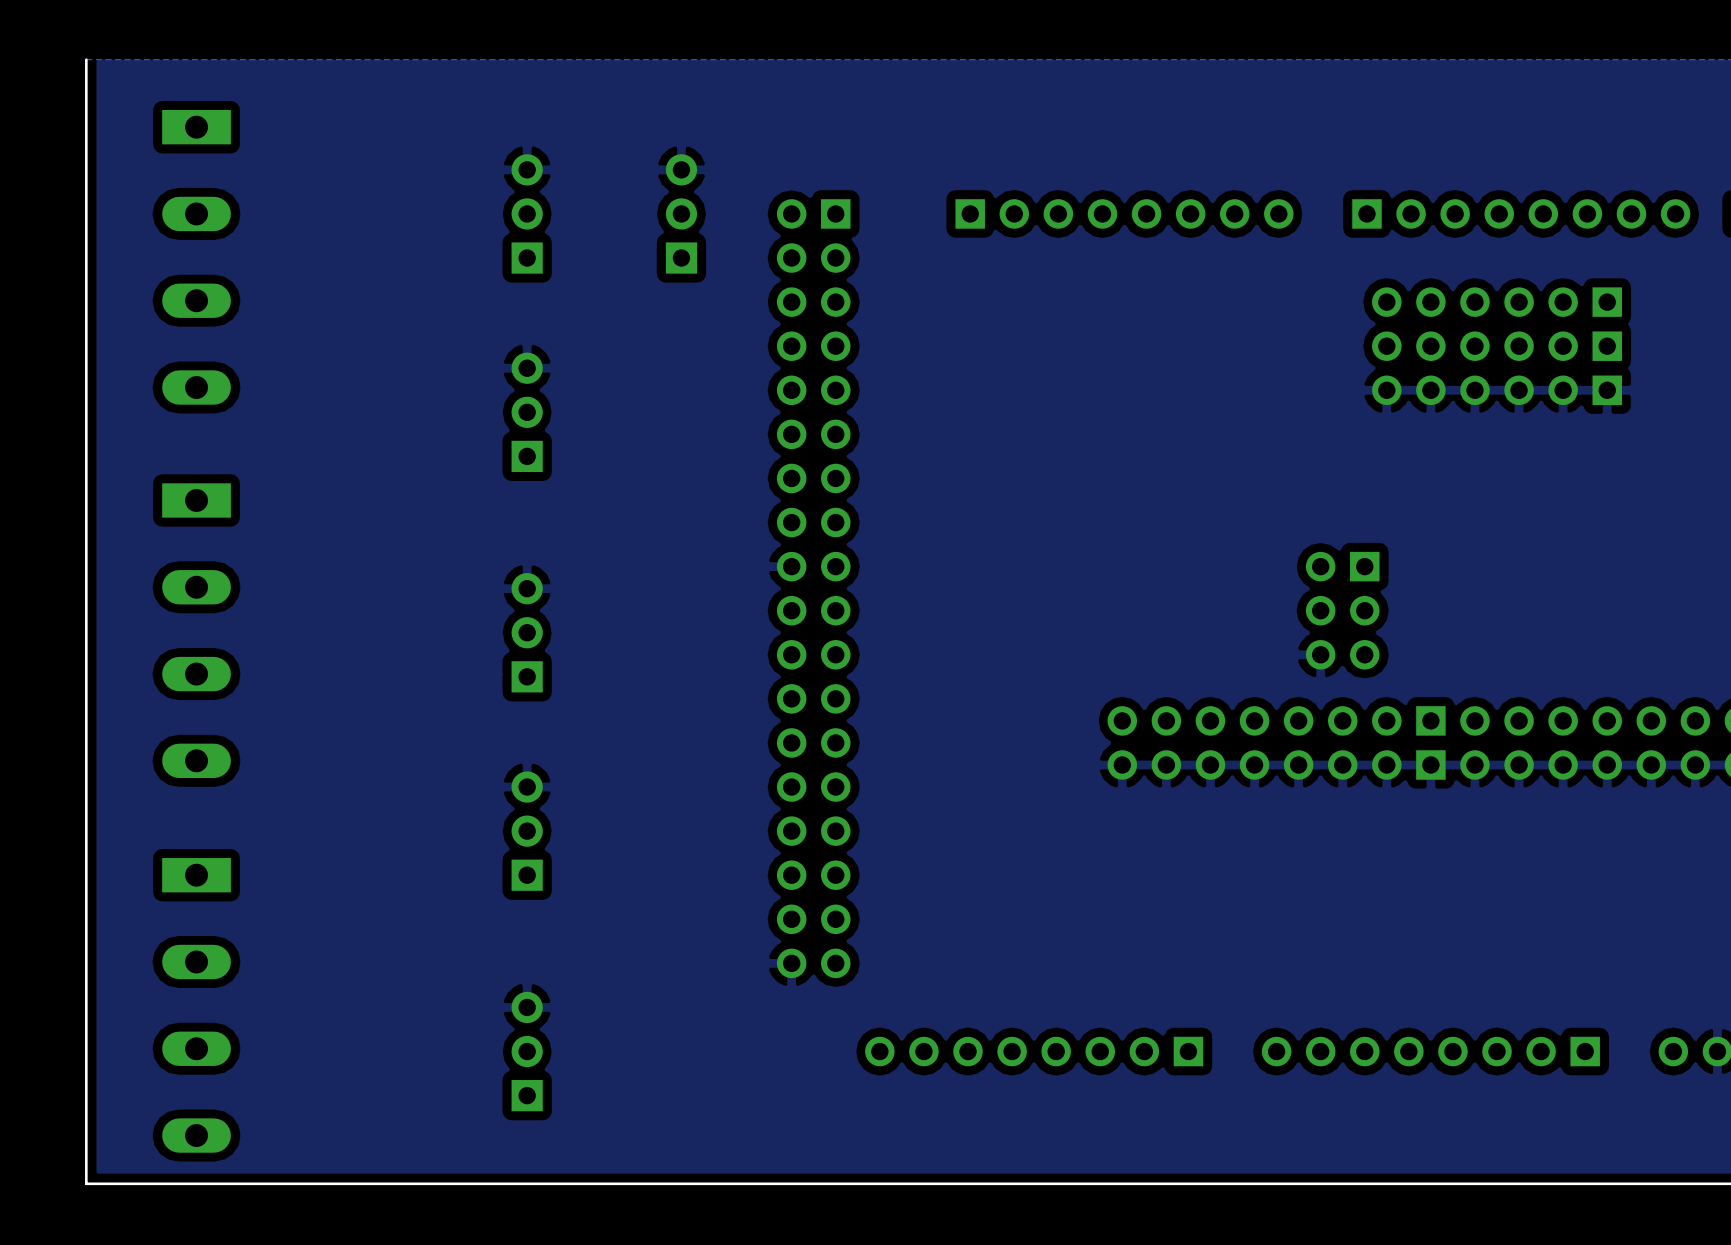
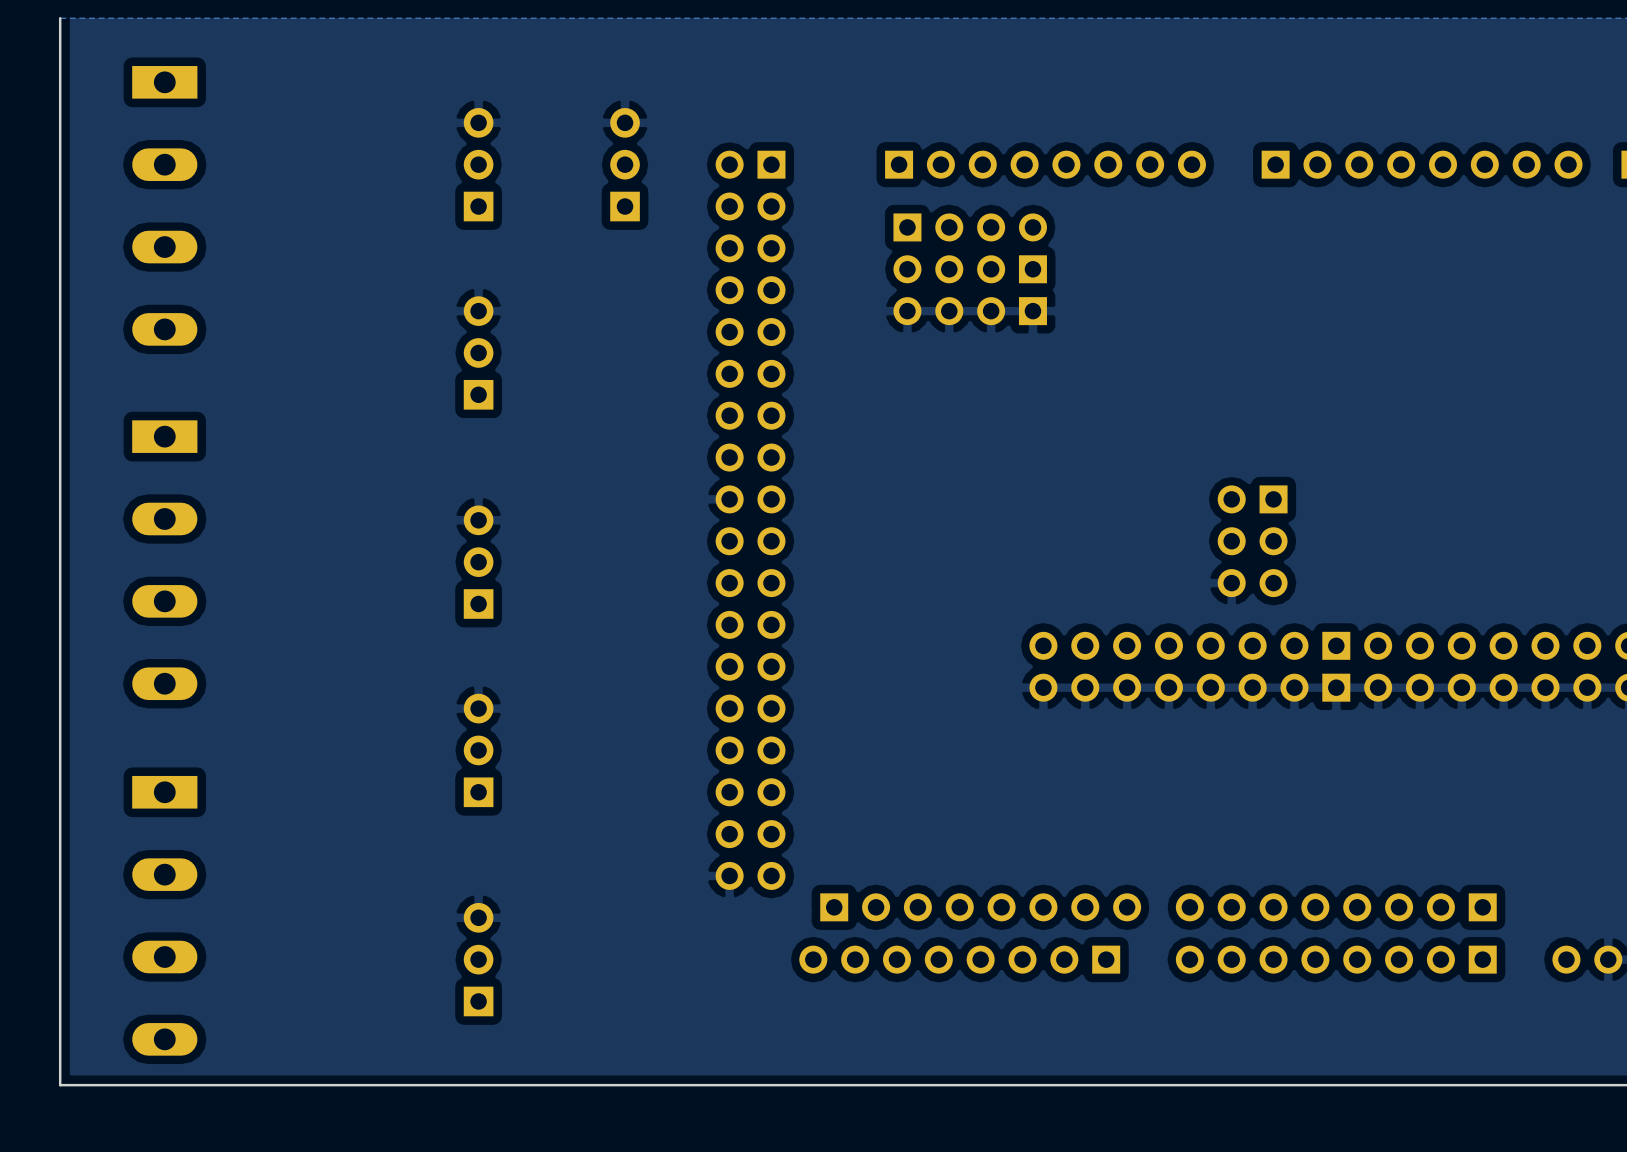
part: none -> (970, 227)
part: (1497, 302) -> none
part: none -> (970, 269)
part: (1497, 346) -> none
part: none -> (970, 311)
part: (1497, 390) -> none
part: none -> (980, 907)
part: none -> (1336, 907)

